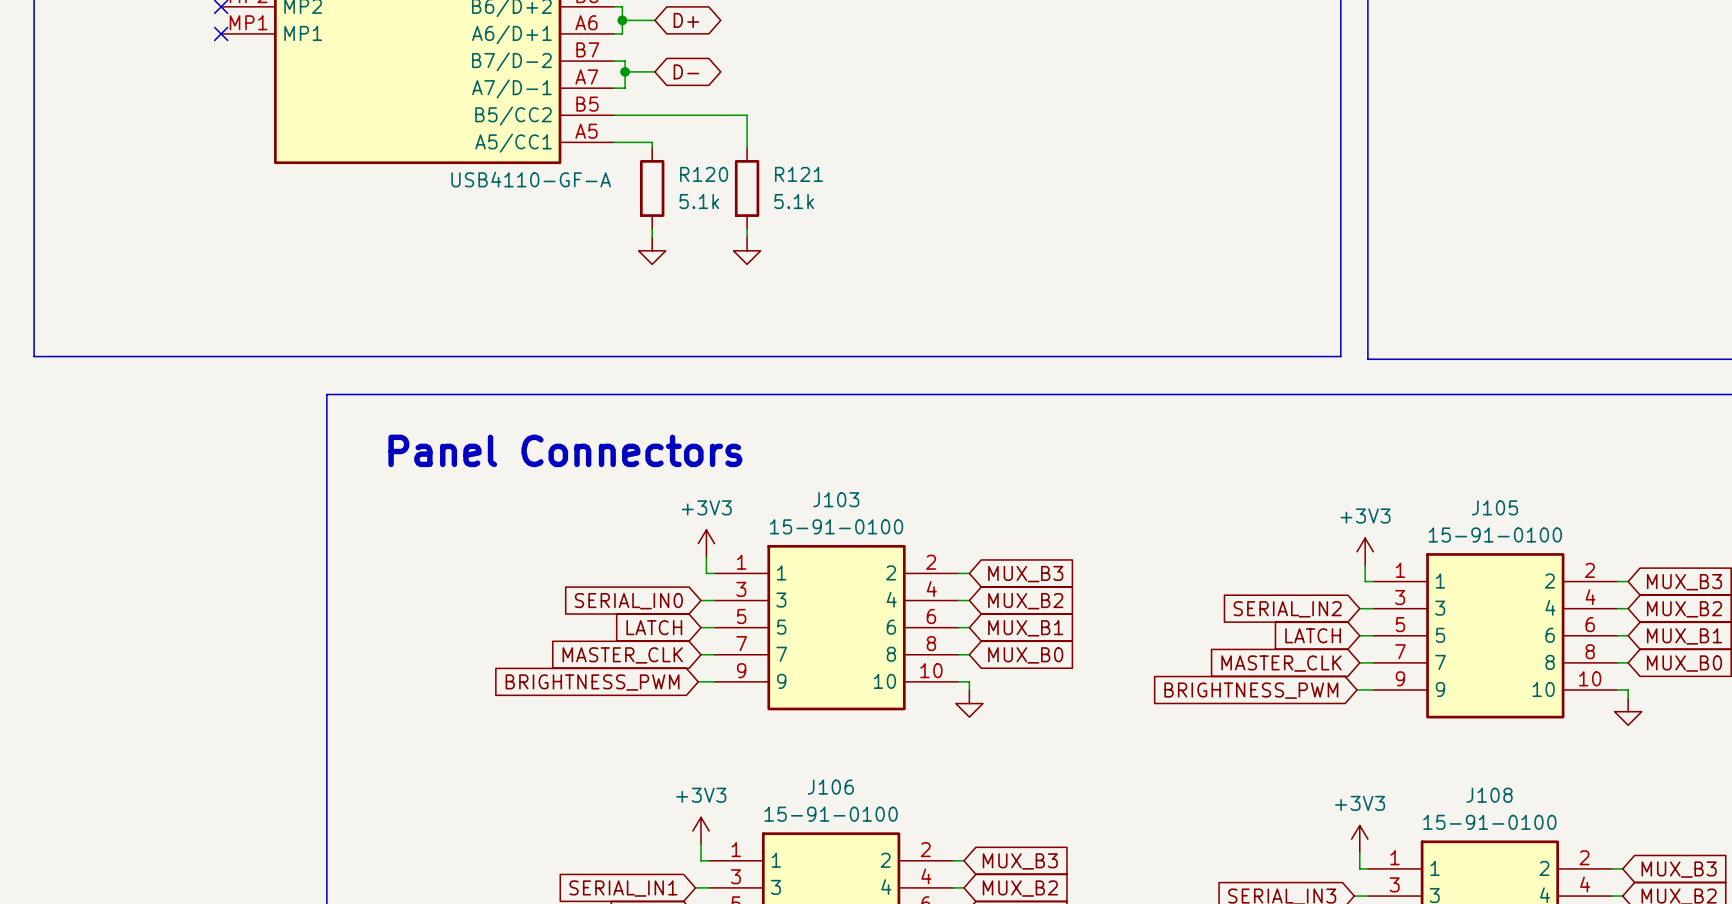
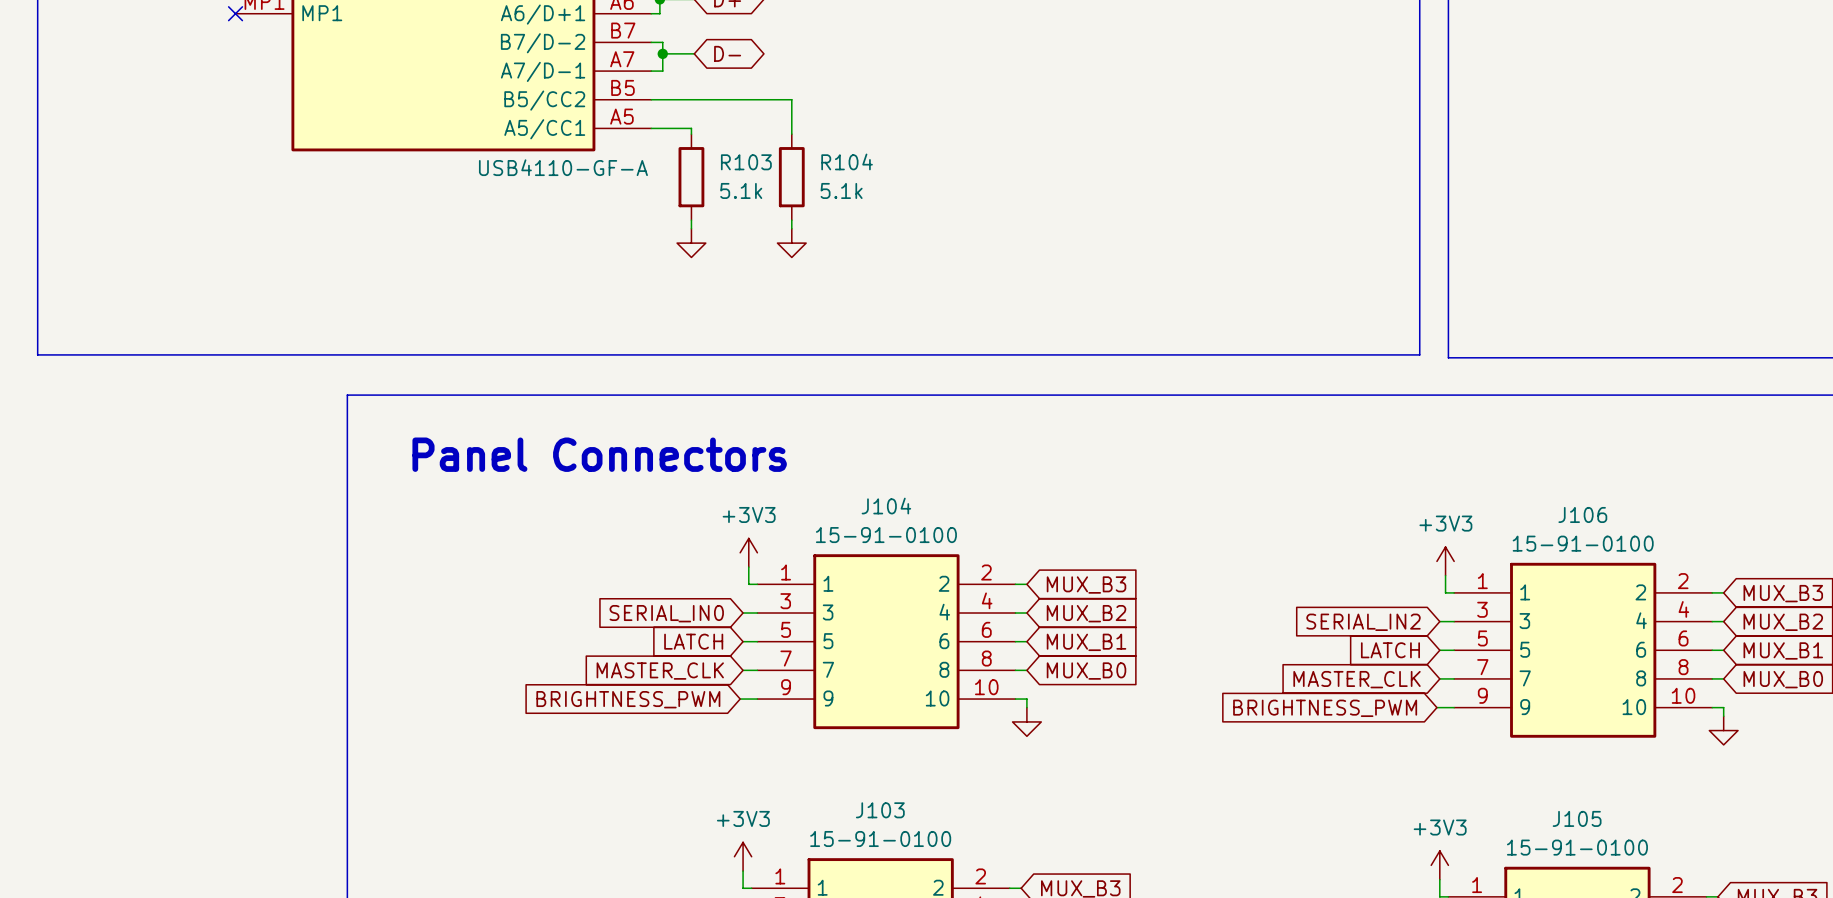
R120 name: R120 (704, 174) -> R103 (746, 162)
R121 name: R121 (799, 174) -> R104 (847, 161)
J103 name: J103 (836, 499) -> J104 (886, 506)
J105 name: J105 (1494, 507) -> J106 (1582, 514)
J106 name: J106 (830, 787) -> J103 (880, 810)
J108 name: J108 (1489, 795) -> J105 (1577, 818)

